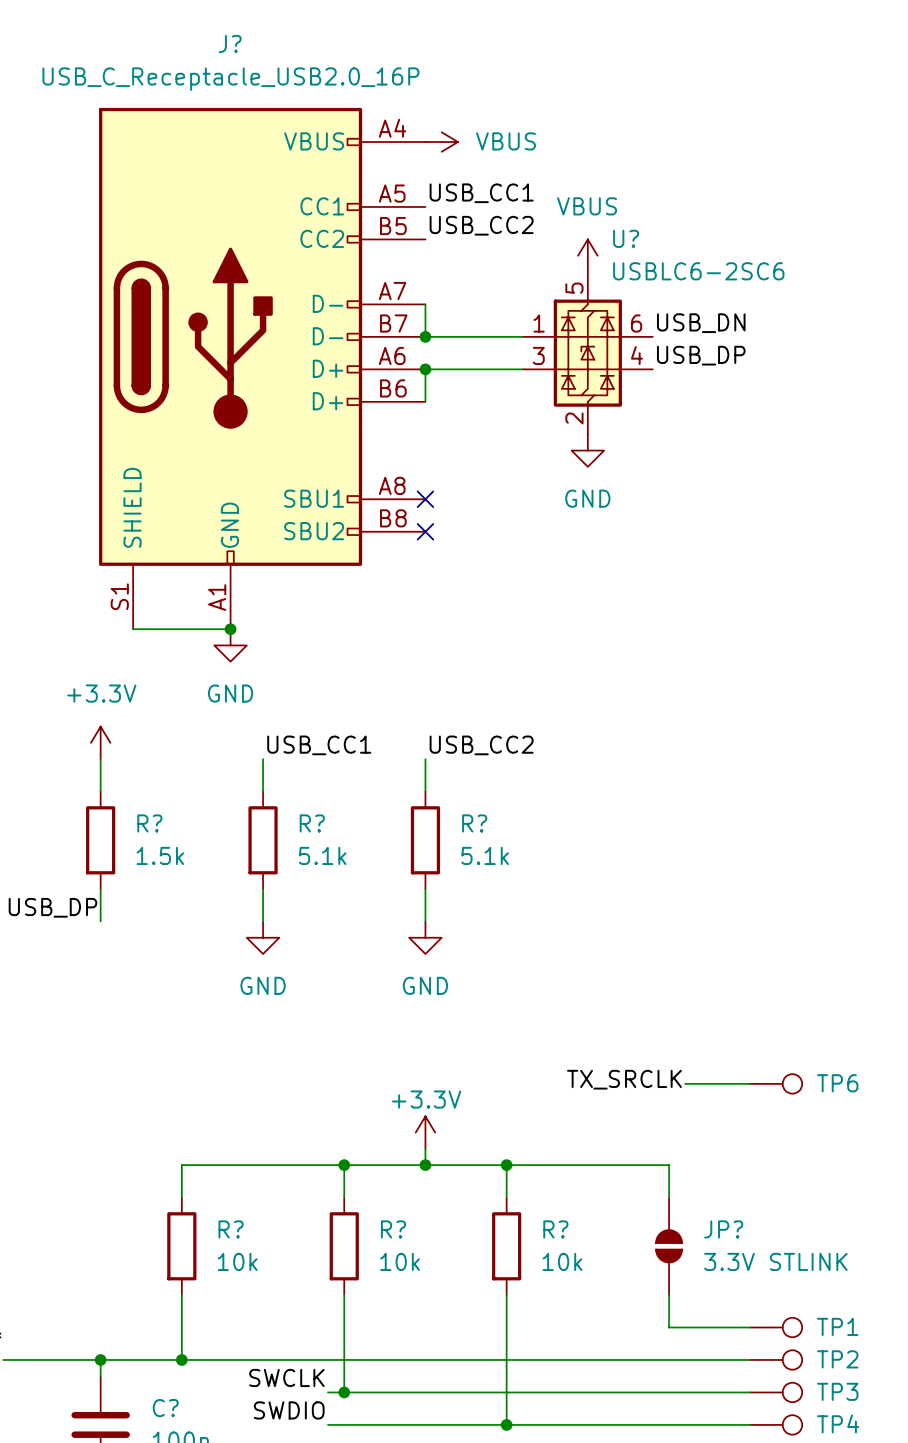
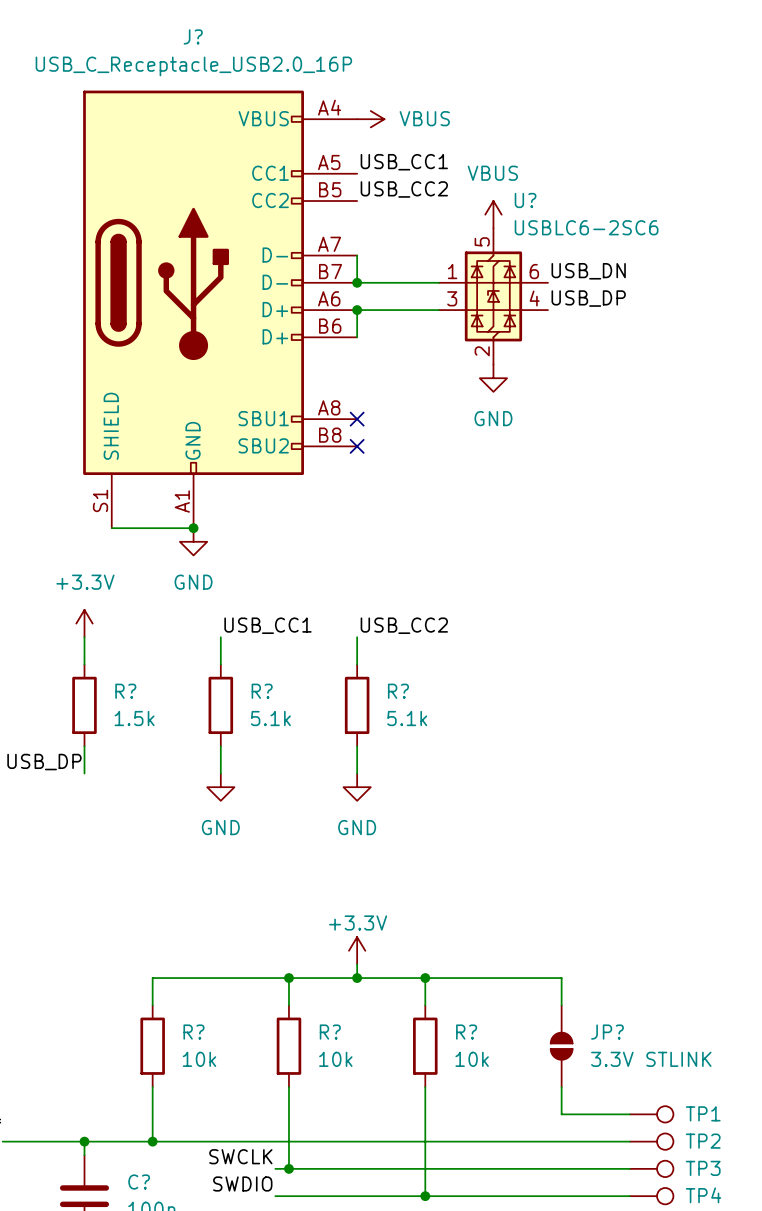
label: TX_SRCLK (624, 1079) -> none
wire: (685, 1083) (750, 1083) -> none
TP6: (776, 1083) -> none

